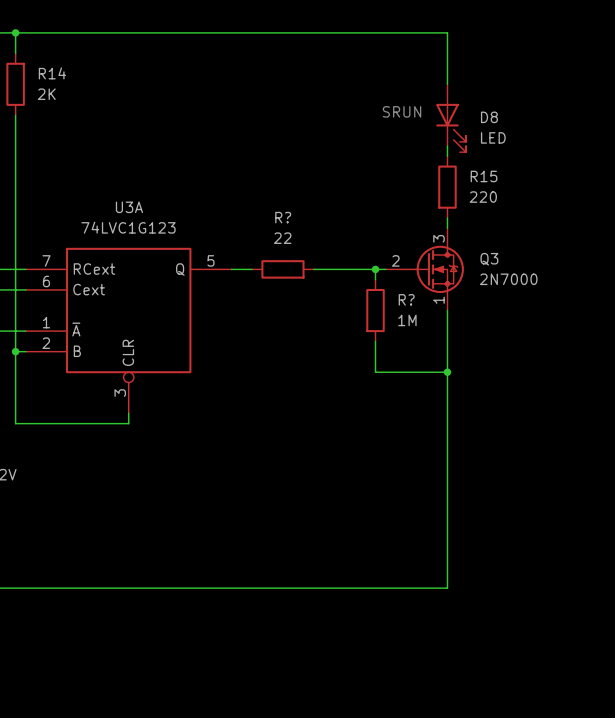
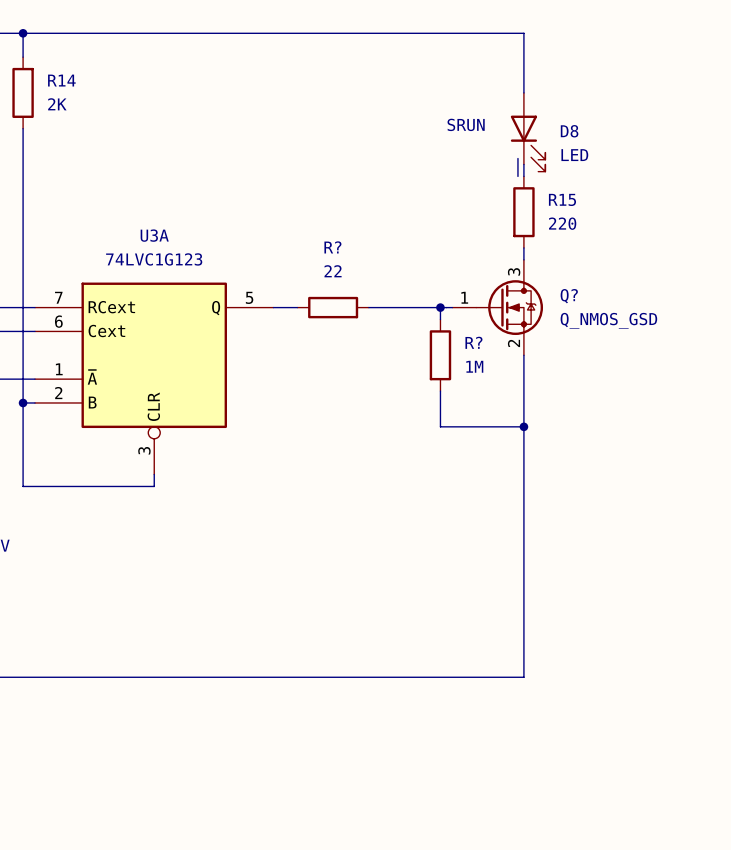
wire: none -> (517, 158) (517, 176)
Q3 name: Q3 (489, 259) -> Q? (569, 296)
Q3 pin number: 2 (395, 260) -> 1 (464, 297)
Q3 value: 2N7000 (508, 279) -> Q_NMOS_GSD (608, 320)
Q3 pin number: 1 (438, 300) -> 2 (513, 343)

